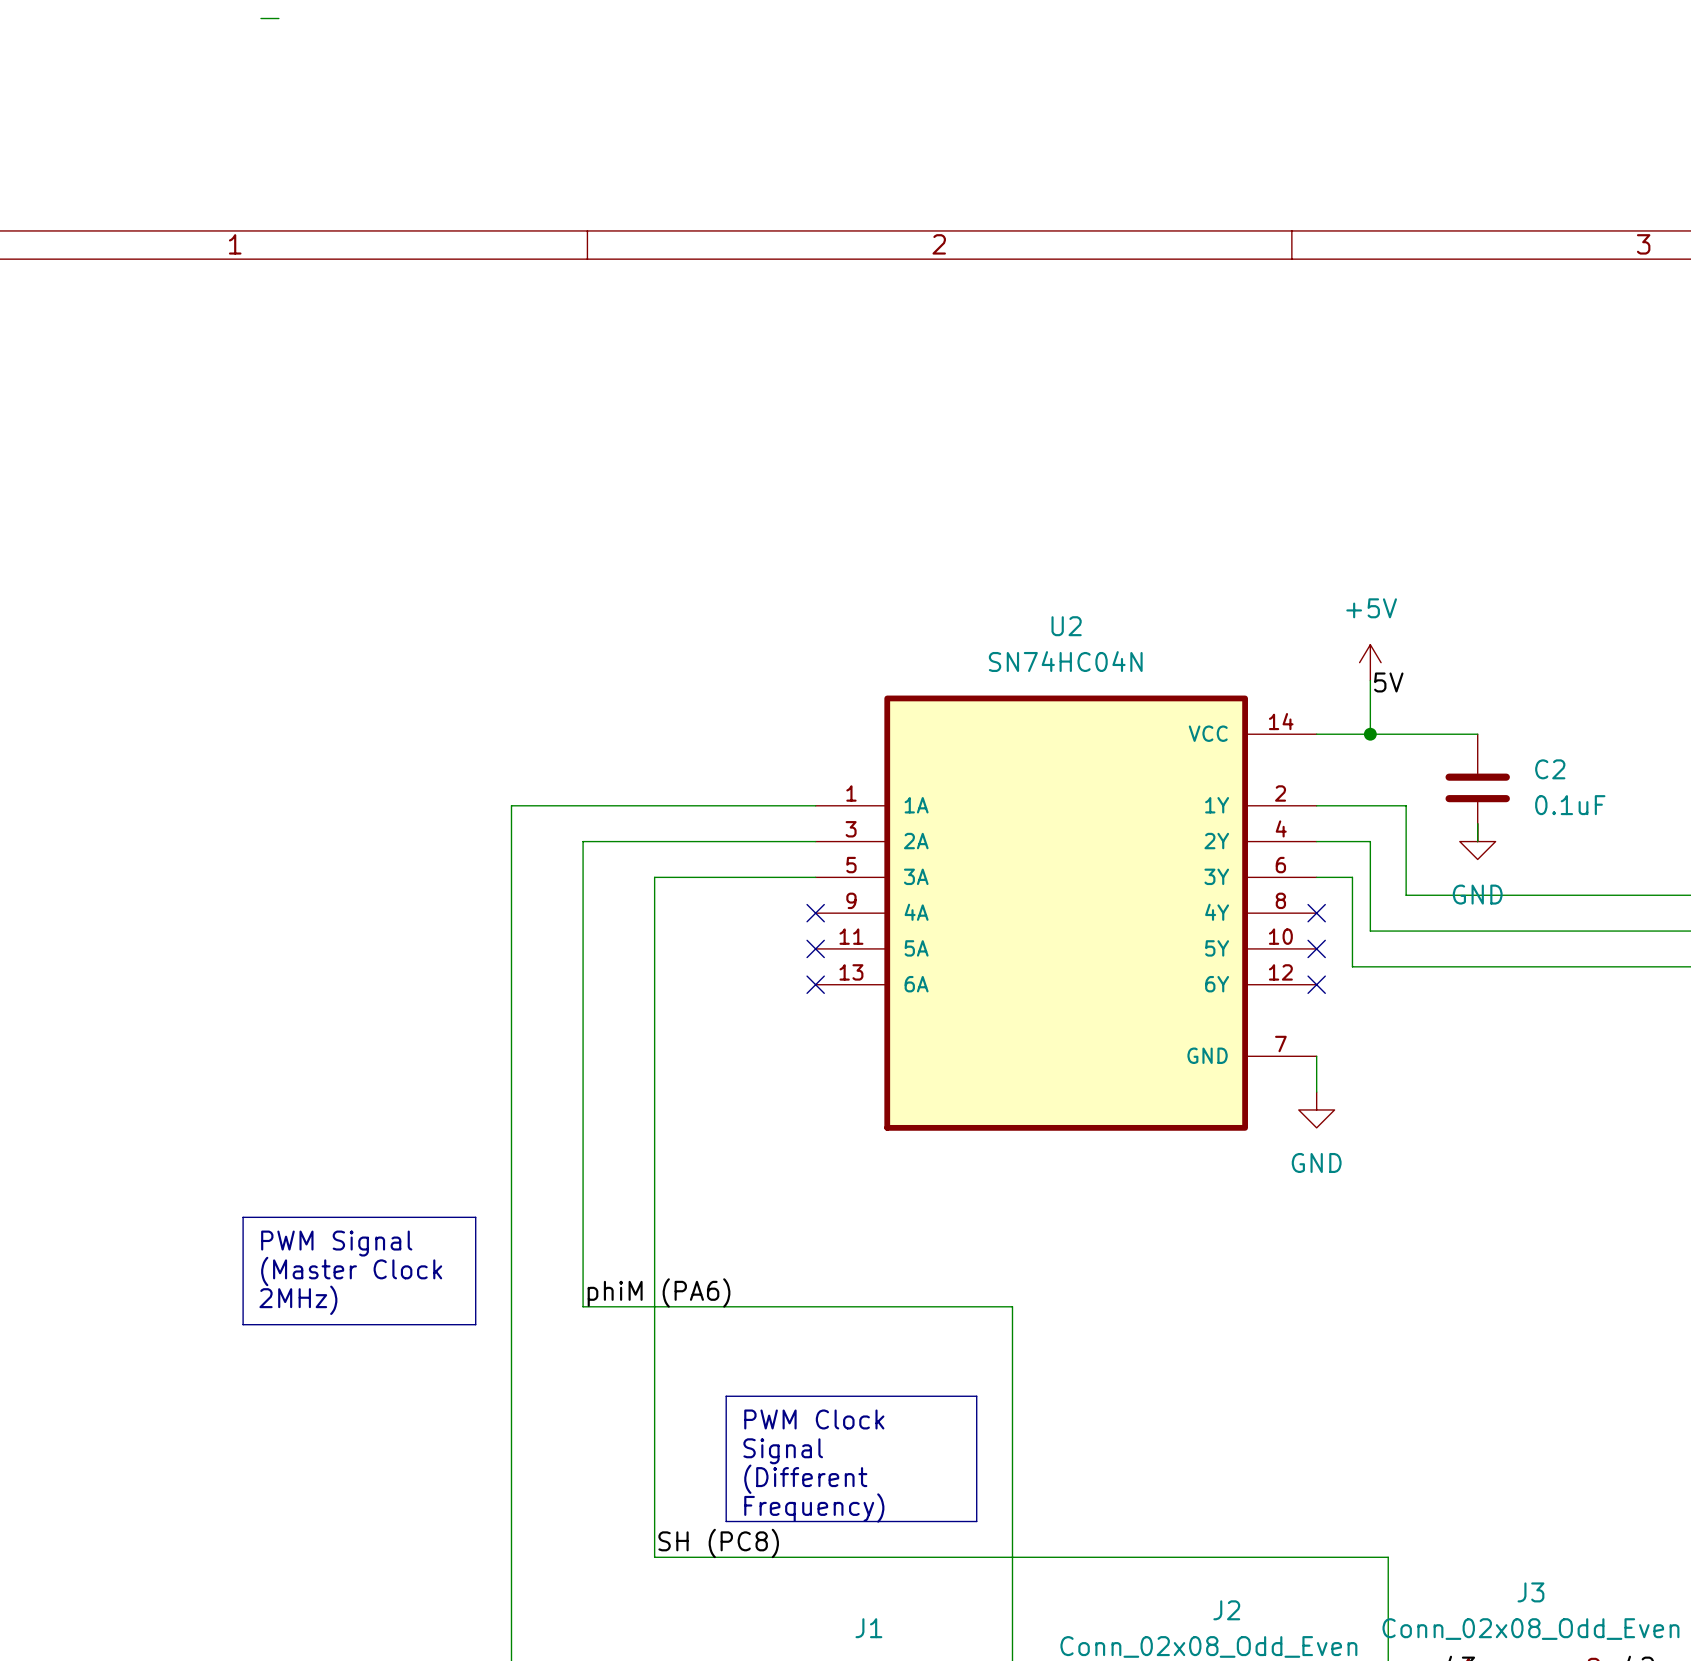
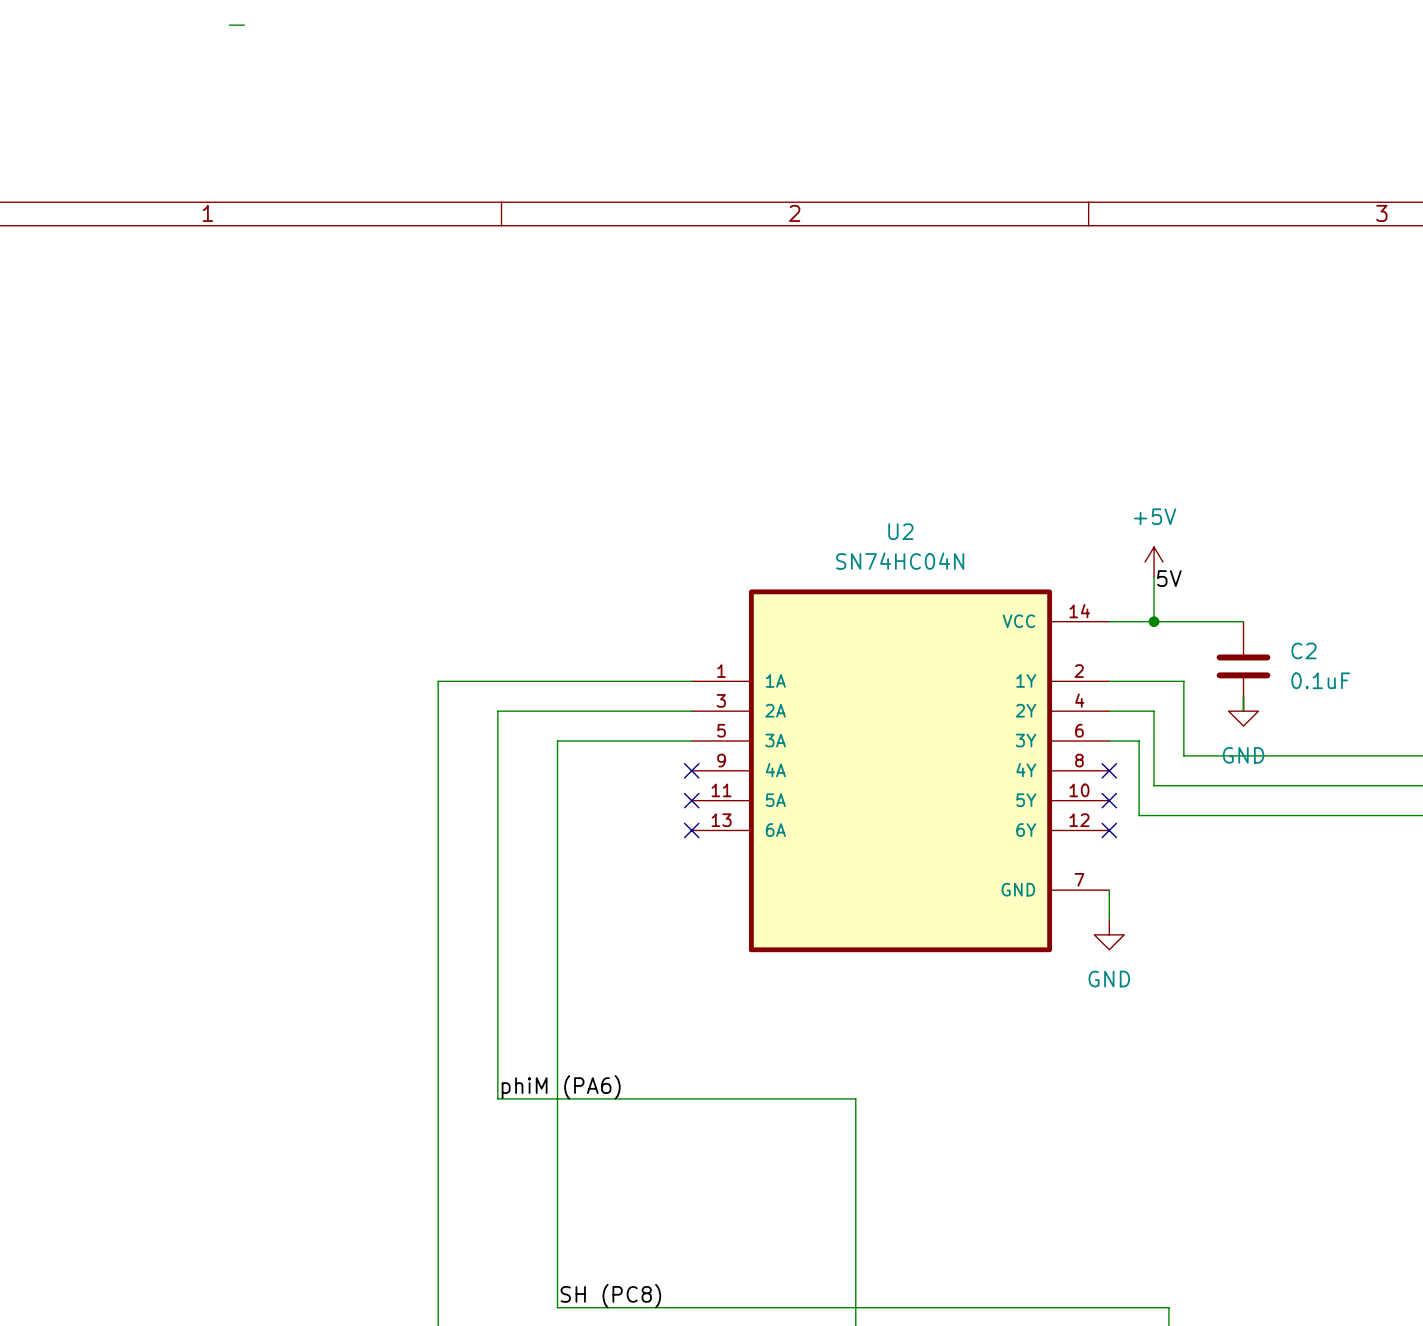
line: (243, 1217) (475, 1217) (475, 1324) (243, 1324) (243, 1217) -> none
text: PWM Signal (336, 1243) -> none
text: (Master Clock (351, 1271) -> none
text: 2MHz) (298, 1300) -> none
line: (726, 1396) (976, 1396) (976, 1521) (726, 1521) (726, 1396) -> none
text: PWM Clock (814, 1419) -> none
text: Signal (783, 1451) -> none
text: (Different (805, 1479) -> none
text: Frequency) (814, 1508) -> none

